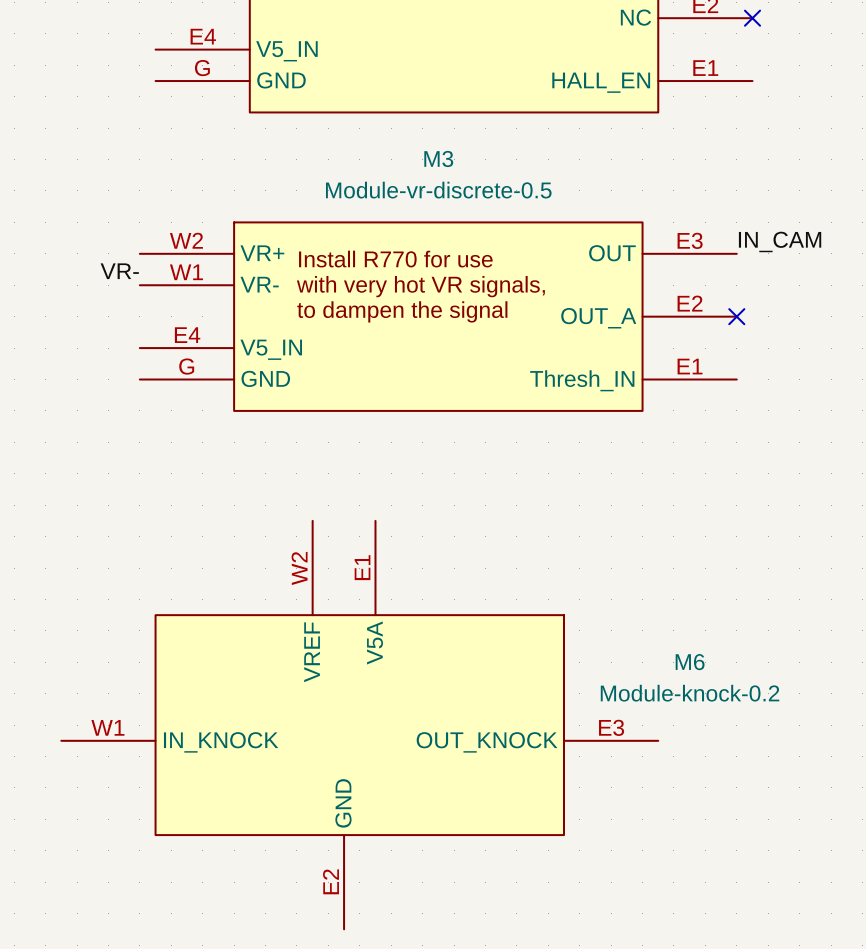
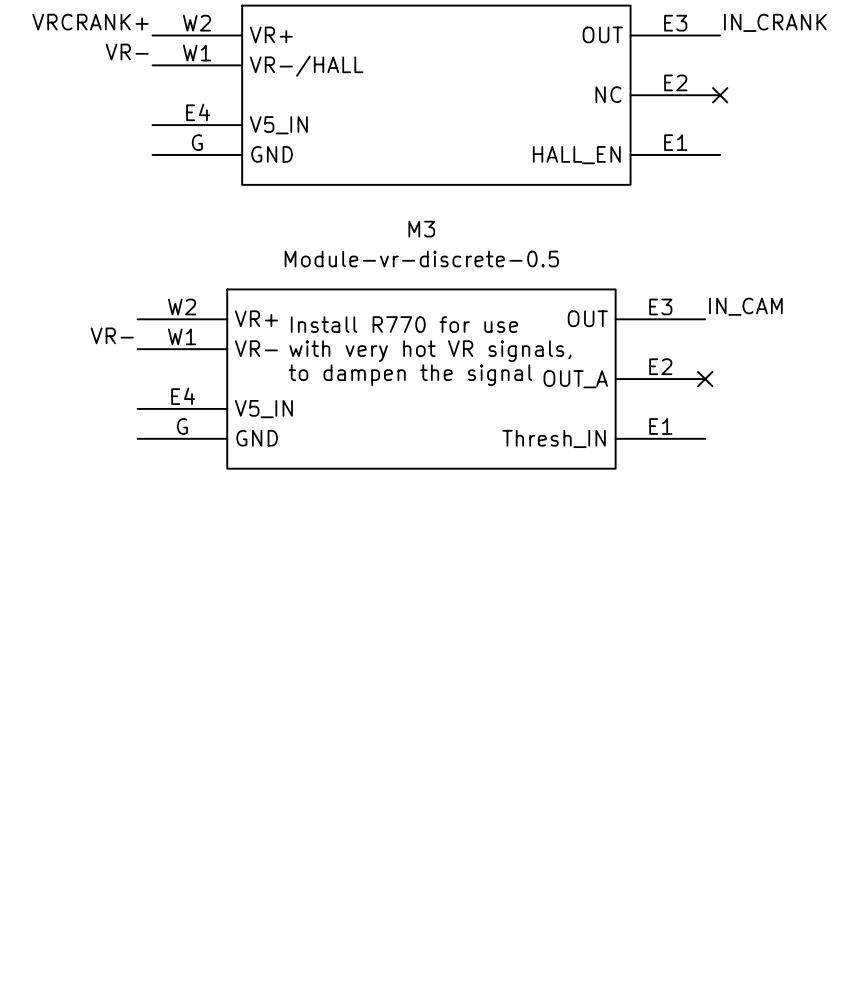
M6: Module-knock-0.2 (359, 725) -> none

